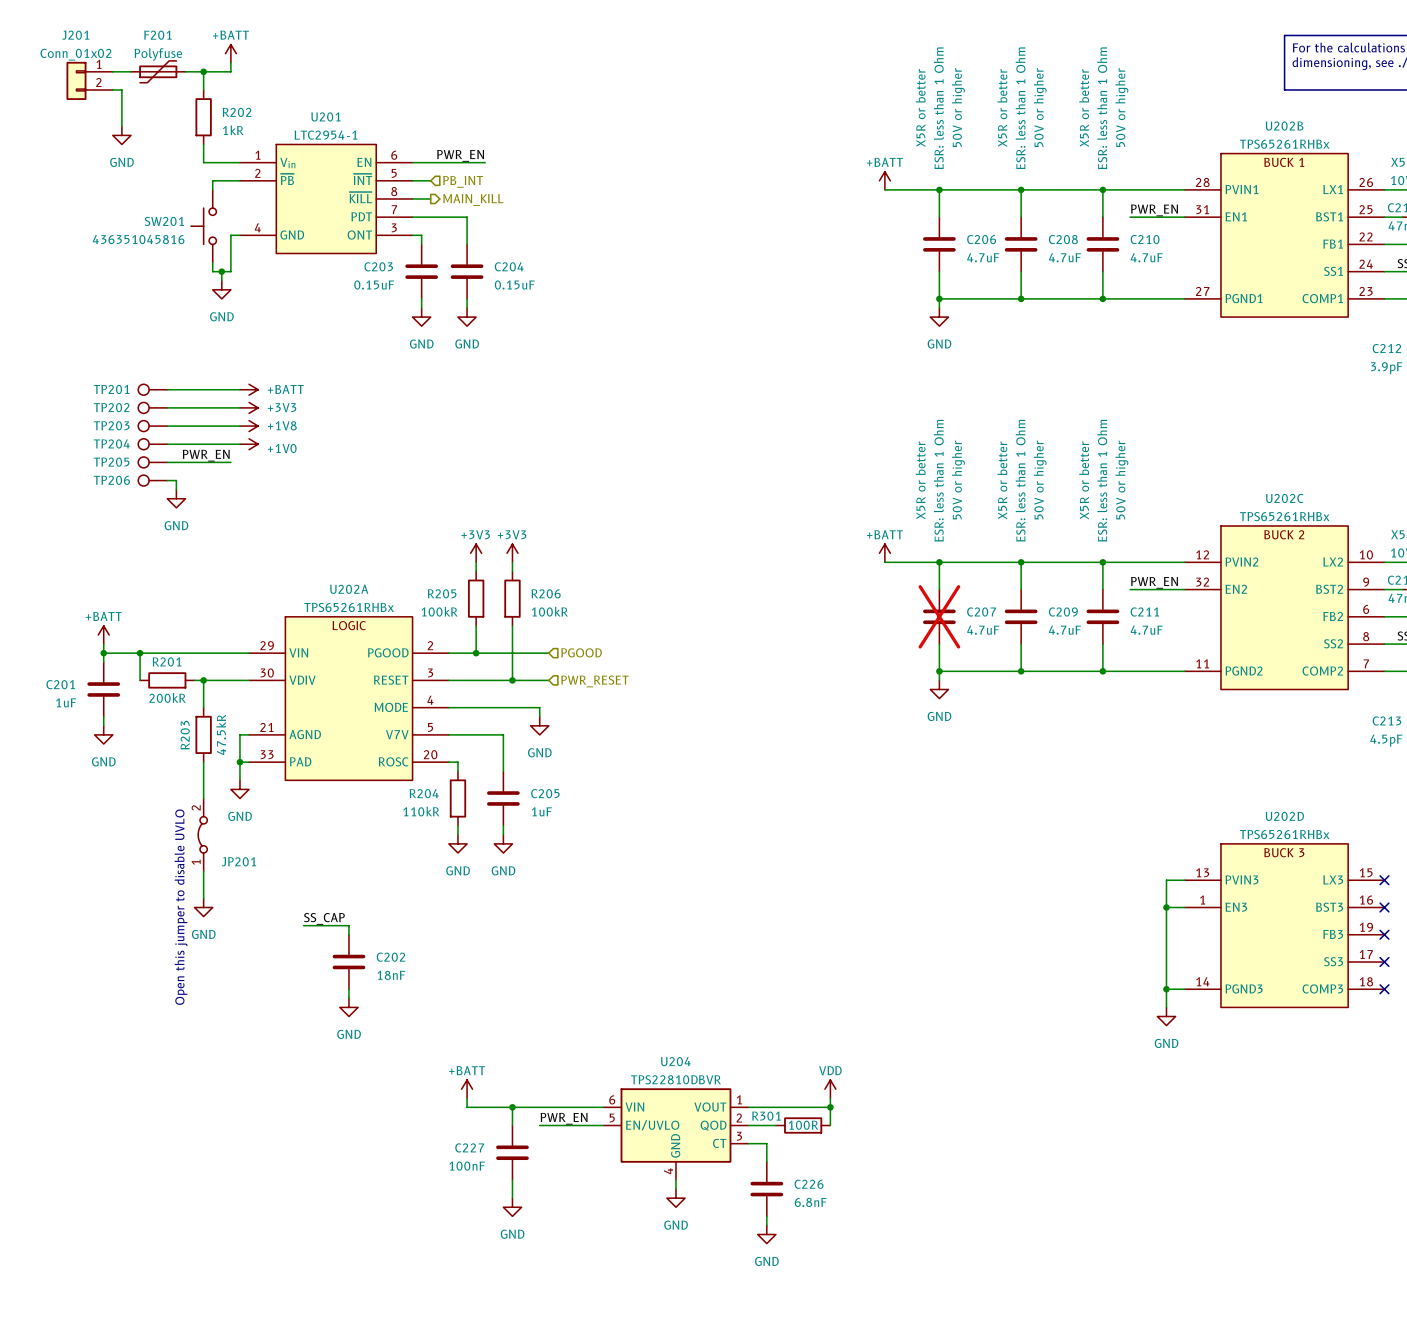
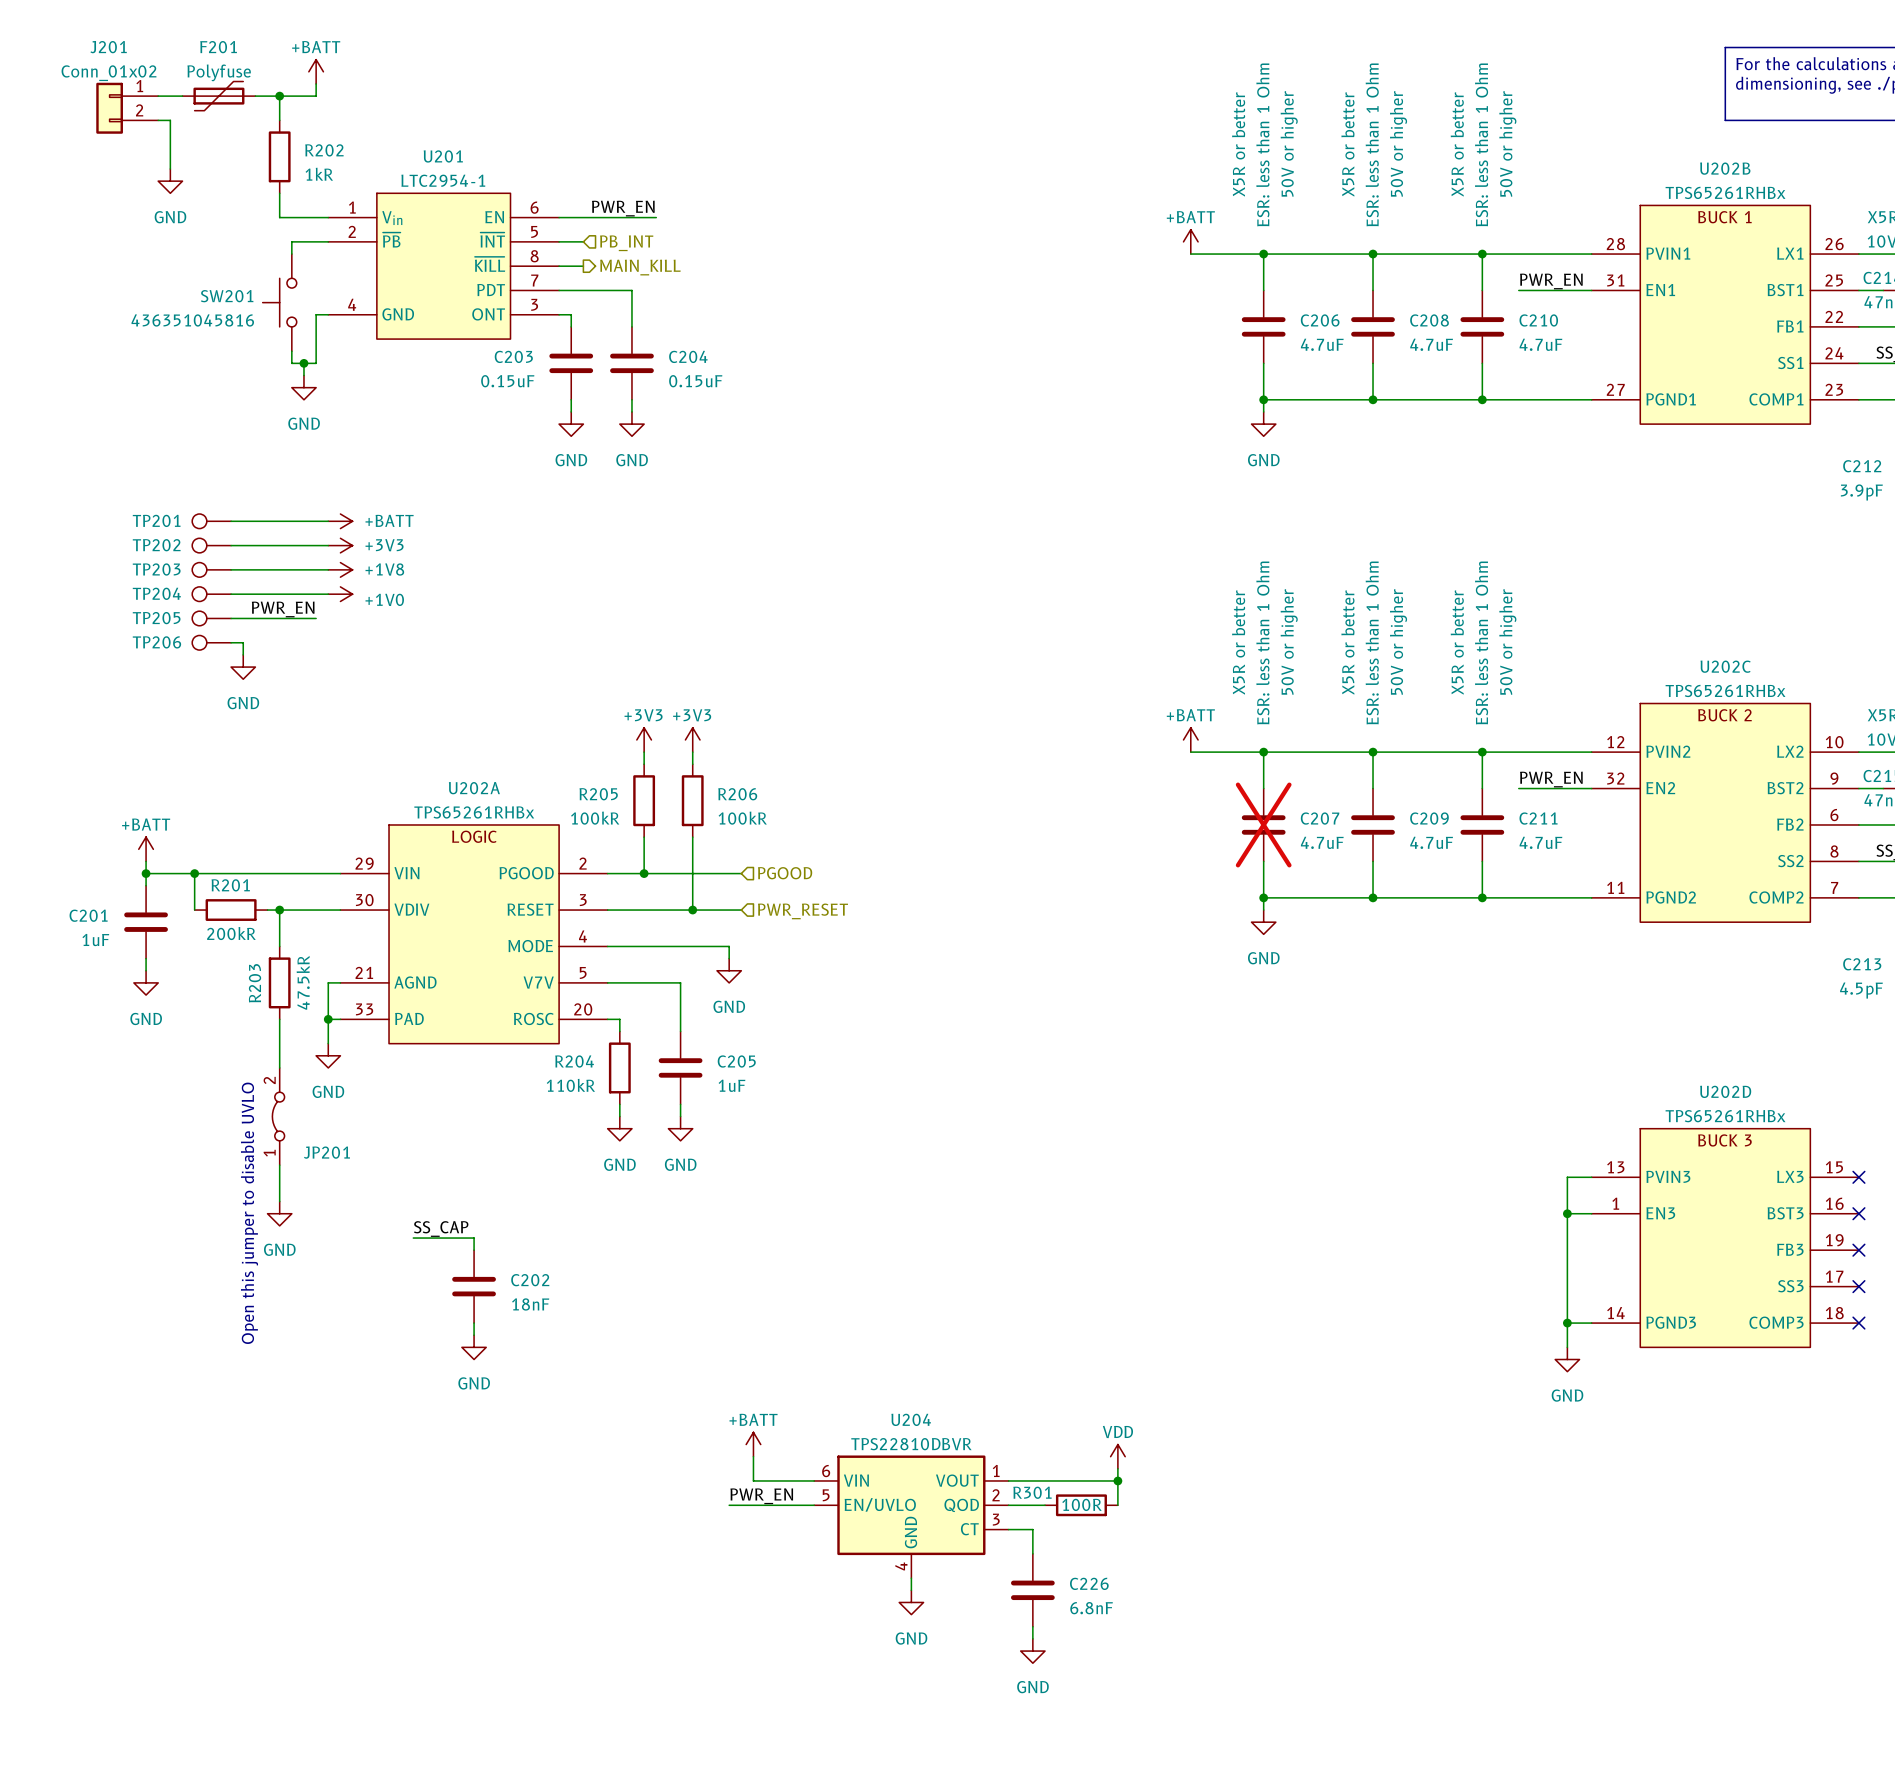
power symbol position: +BATT (467, 1089) -> +BATT (753, 1444)
wire: (467, 1098) (467, 1107) (557, 1107) -> (753, 1456) (753, 1480)
wire: (512, 1107) (512, 1125) -> none
junction: (512, 1107) -> none
C227: 100nF (512, 1152) -> none
wire: (512, 1180) (512, 1198) -> none
power symbol: GND (512, 1207) -> none

